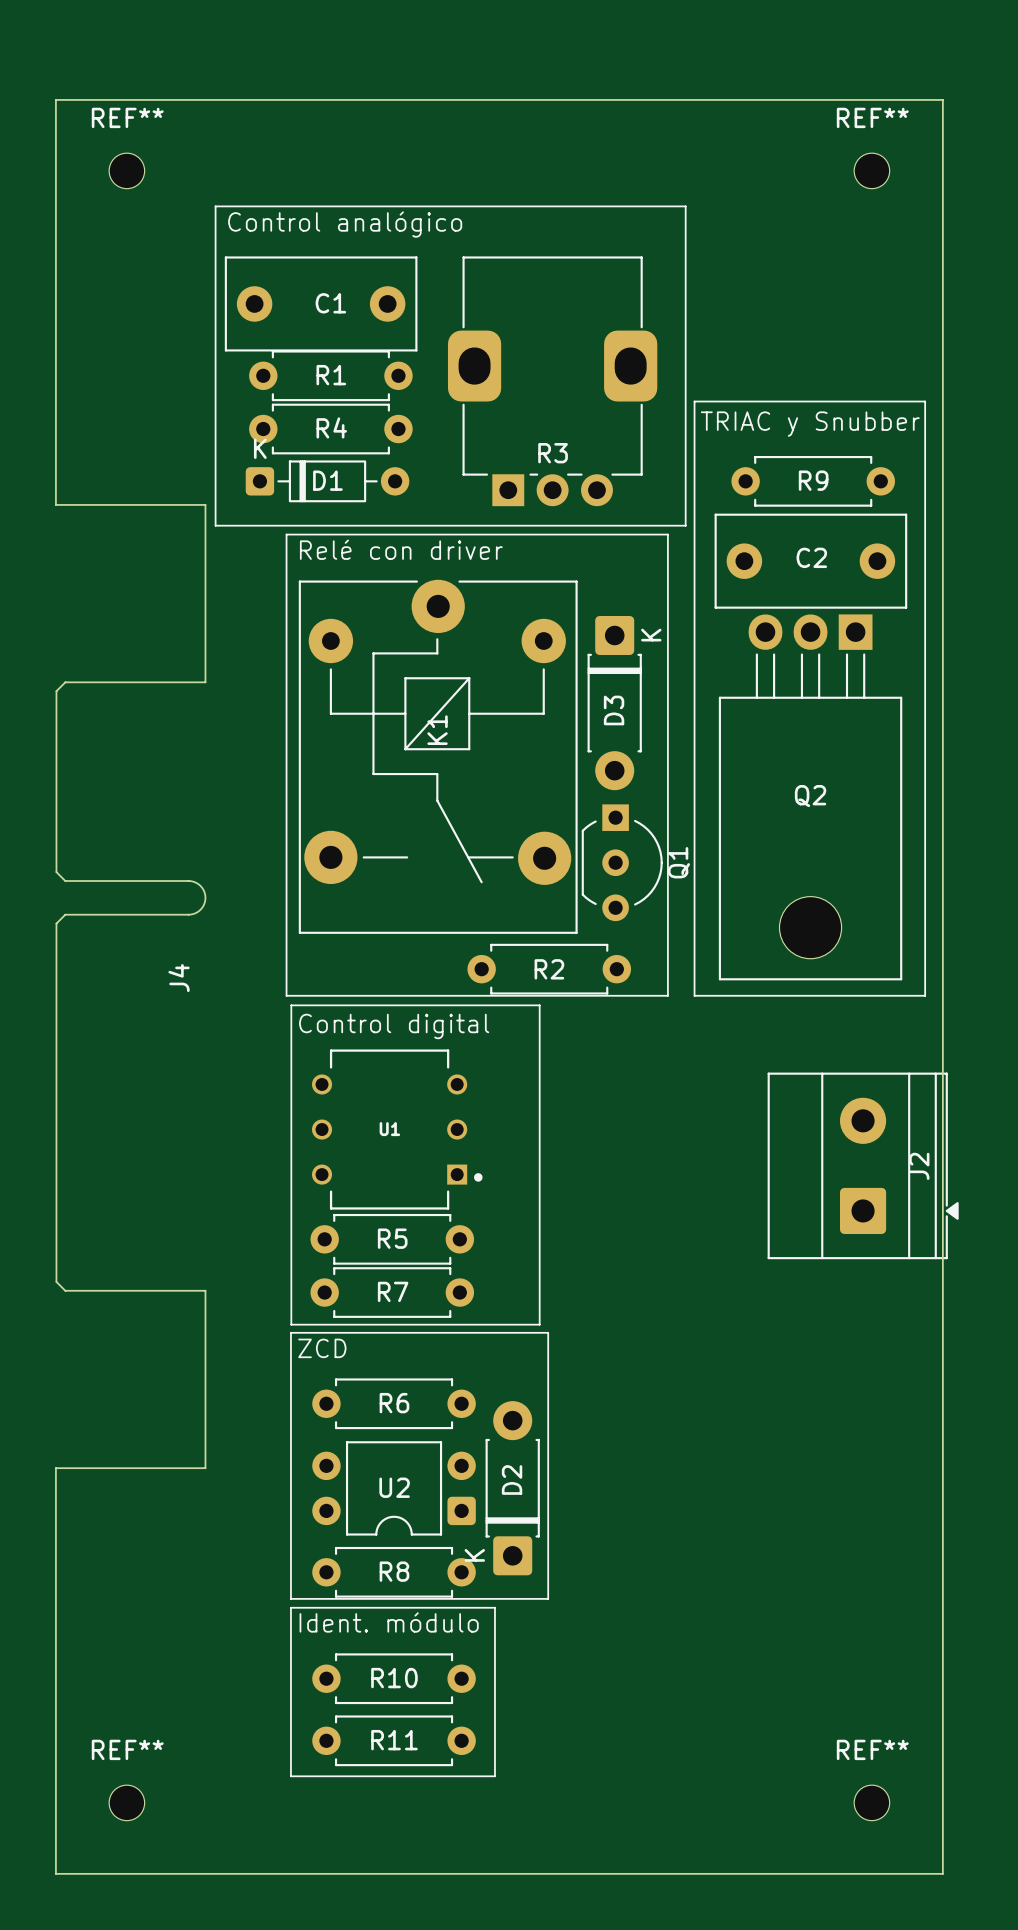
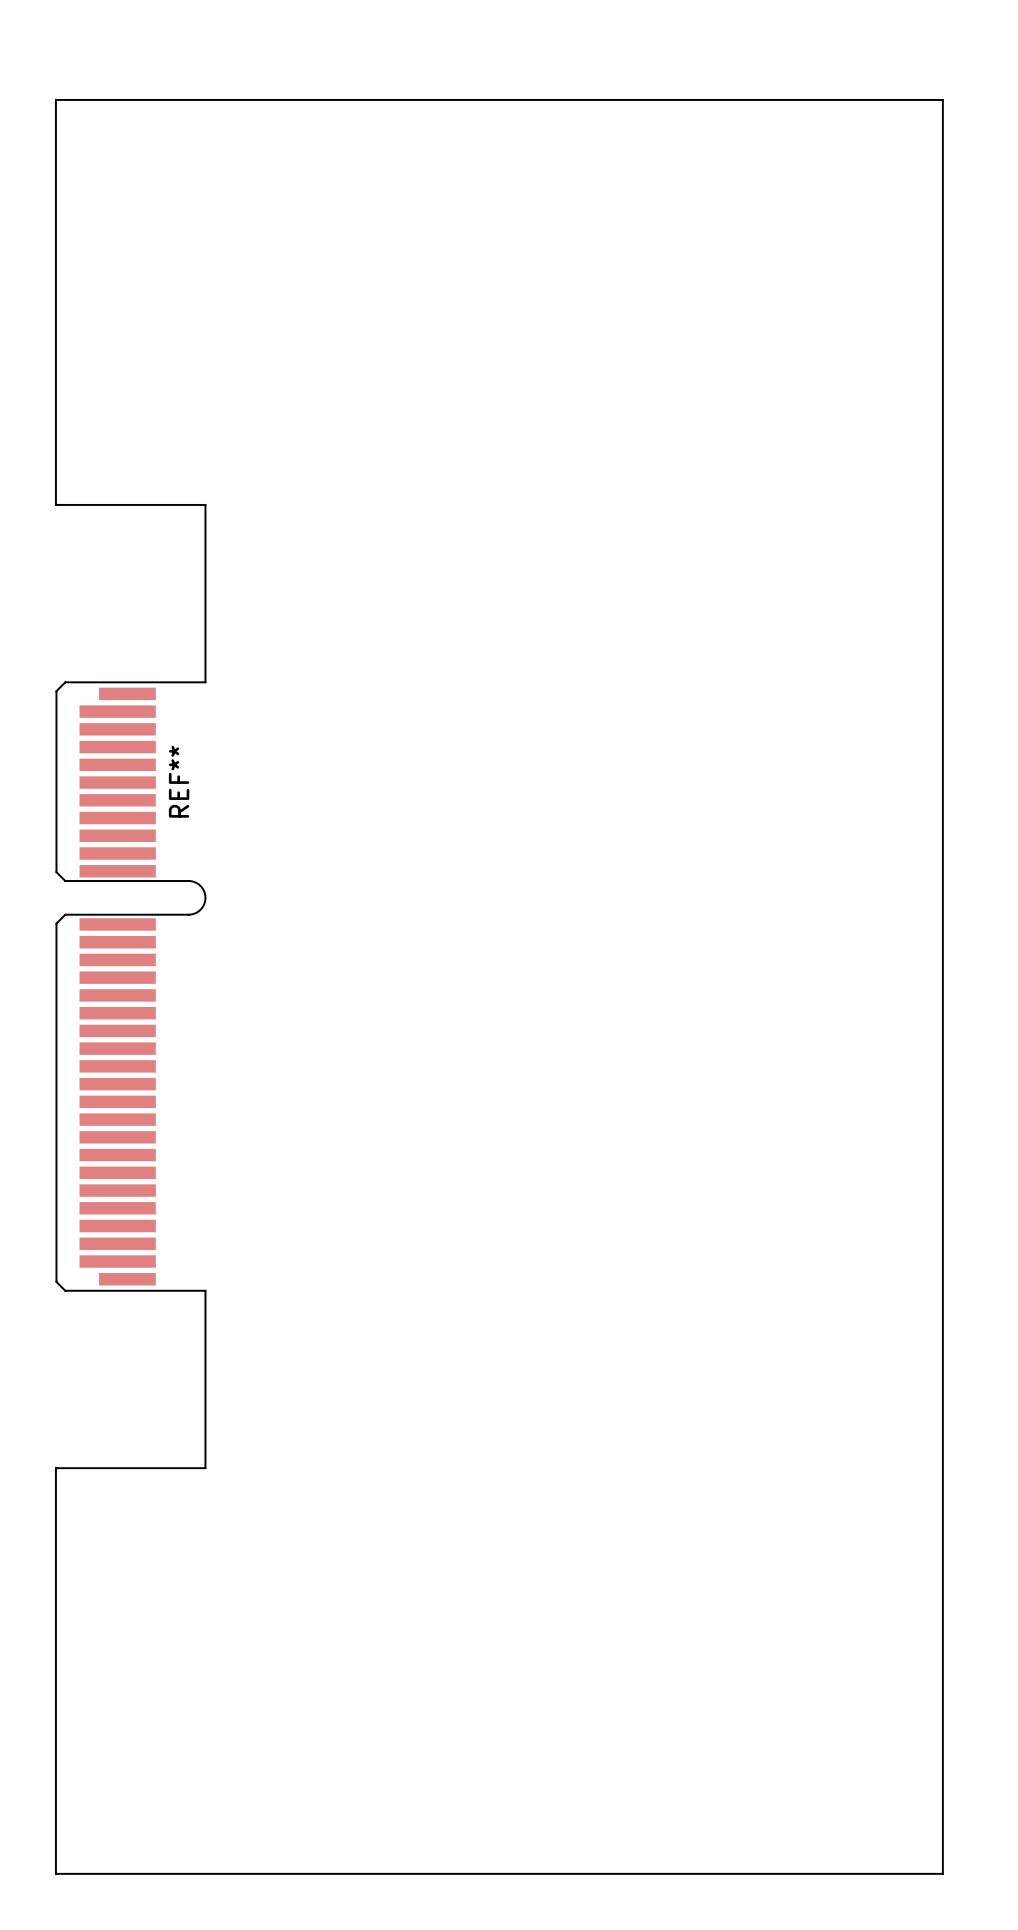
REF**: (126, 170) -> none
REF**: (871, 170) -> none
line: (215, 206) (685, 206) (685, 525) (215, 525) (215, 206) -> none
text: Control analógico (345, 224) -> none
C1: (321, 303) -> none
R1: (330, 375) -> none
R3: (552, 381) -> none
line: (694, 401) (925, 401) (925, 995) (694, 995) (694, 401) -> none
text: TRIAC y Snubber (810, 424) -> none
R4: (330, 429) -> none
D1: (327, 481) -> none
R9: (813, 481) -> none
line: (286, 534) (667, 534) (667, 995) (286, 995) (286, 534) -> none
text: Relé con driver (401, 549) -> none
C2: (810, 561) -> none
D3: (614, 703) -> none
K1: (438, 756) -> none
Q2: (810, 797) -> none
Q1: (622, 862) -> none
R2: (549, 969) -> none
J4: (130, 986) -> none
REF**: none -> (130, 986)
line: (291, 1005) (539, 1005) (539, 1324) (291, 1324) (291, 1005) -> none
text: Control digital (394, 1026) -> none
U1: (397, 1129) -> none
J2: (863, 1165) -> none
R5: (392, 1239) -> none
R7: (392, 1292) -> none
line: (290, 1332) (548, 1332) (548, 1598) (290, 1598) (290, 1332) -> none
text: ZCD (322, 1348) -> none
R6: (394, 1403) -> none
U2: (394, 1488) -> none
D2: (512, 1488) -> none
R8: (394, 1572) -> none
line: (290, 1607) (290, 1776) (494, 1776) (494, 1607) (290, 1607) -> none
text: Ident. módulo (389, 1622) -> none
R10: (394, 1678) -> none
R11: (394, 1740) -> none
REF**: (126, 1802) -> none
REF**: (871, 1802) -> none

